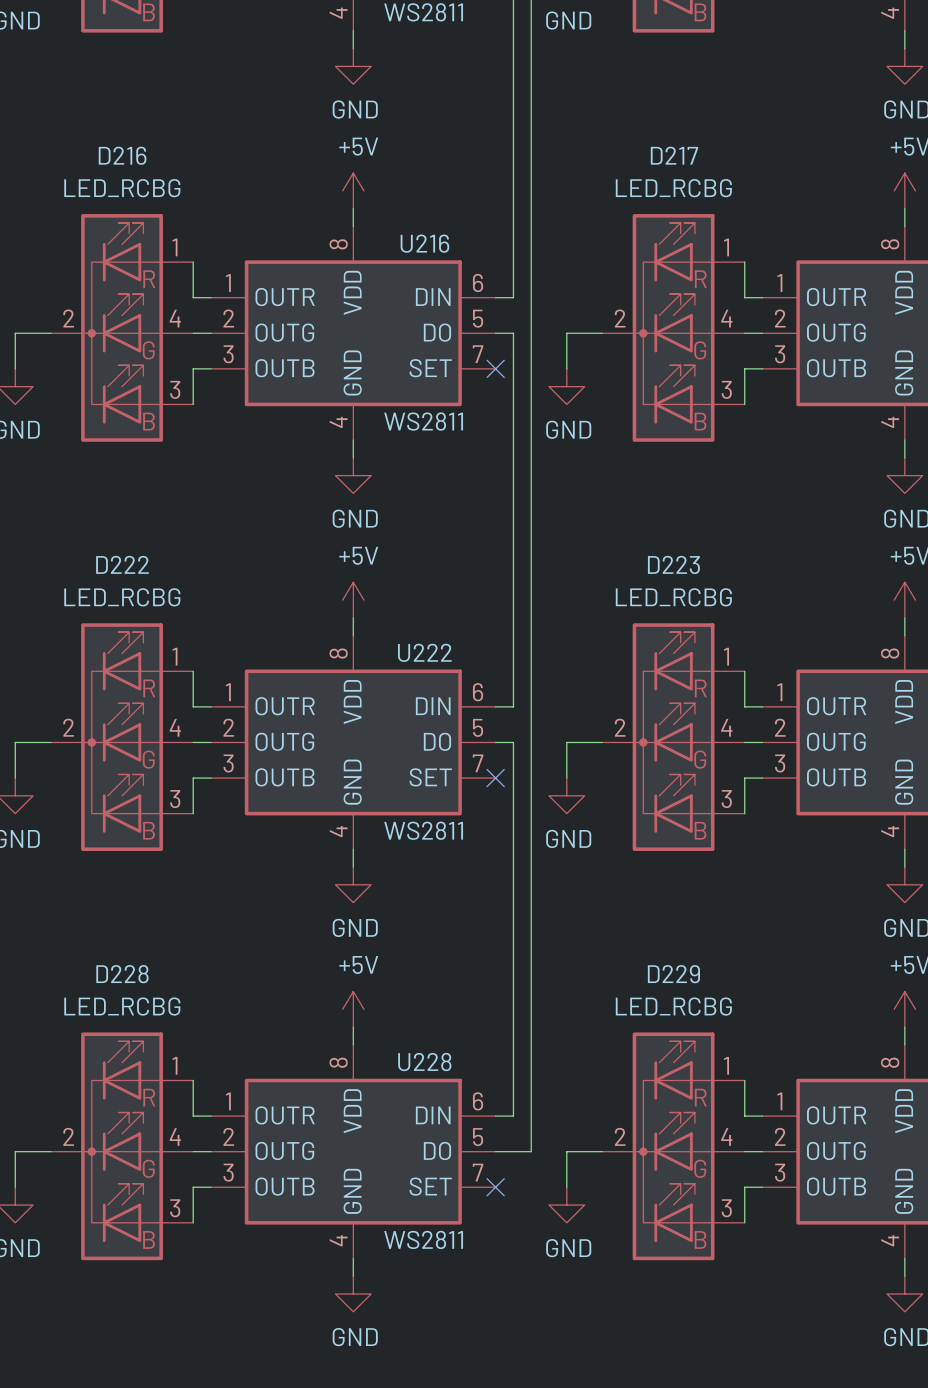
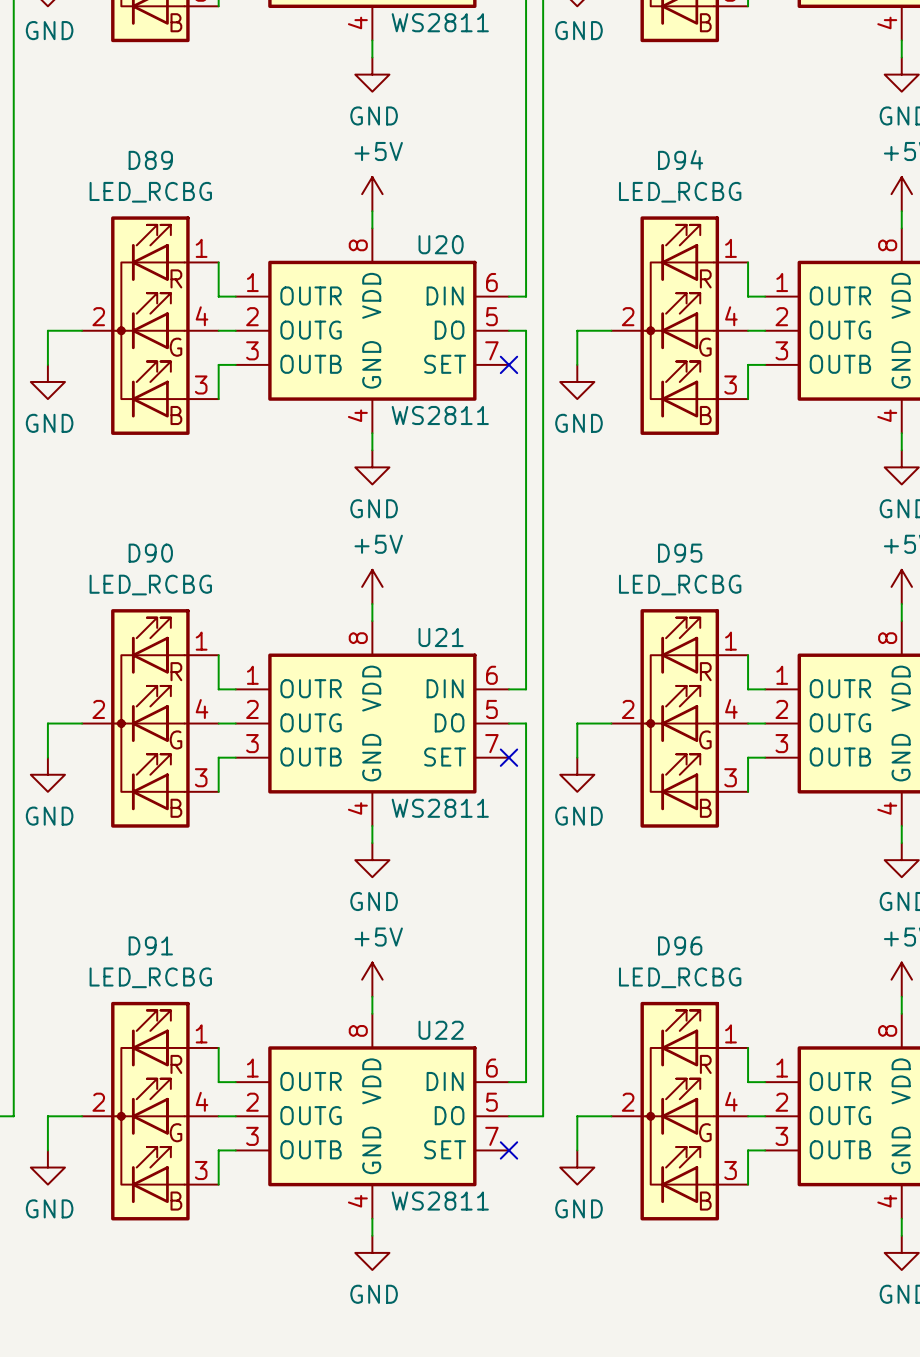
D216 name: D216 (122, 155) -> D89 (150, 160)
D217 name: D217 (674, 155) -> D94 (680, 159)
U216 name: U216 (424, 243) -> U20 (441, 244)
D222 name: D222 (122, 564) -> D90 (150, 553)
D223 name: D223 (673, 564) -> D95 (680, 553)
U222 name: U222 (424, 652) -> U21 (441, 637)
D228 name: D228 (122, 974) -> D91 (150, 945)
D229 name: D229 (673, 974) -> D96 (680, 945)
U228 name: U228 (424, 1062) -> U22 (441, 1030)

